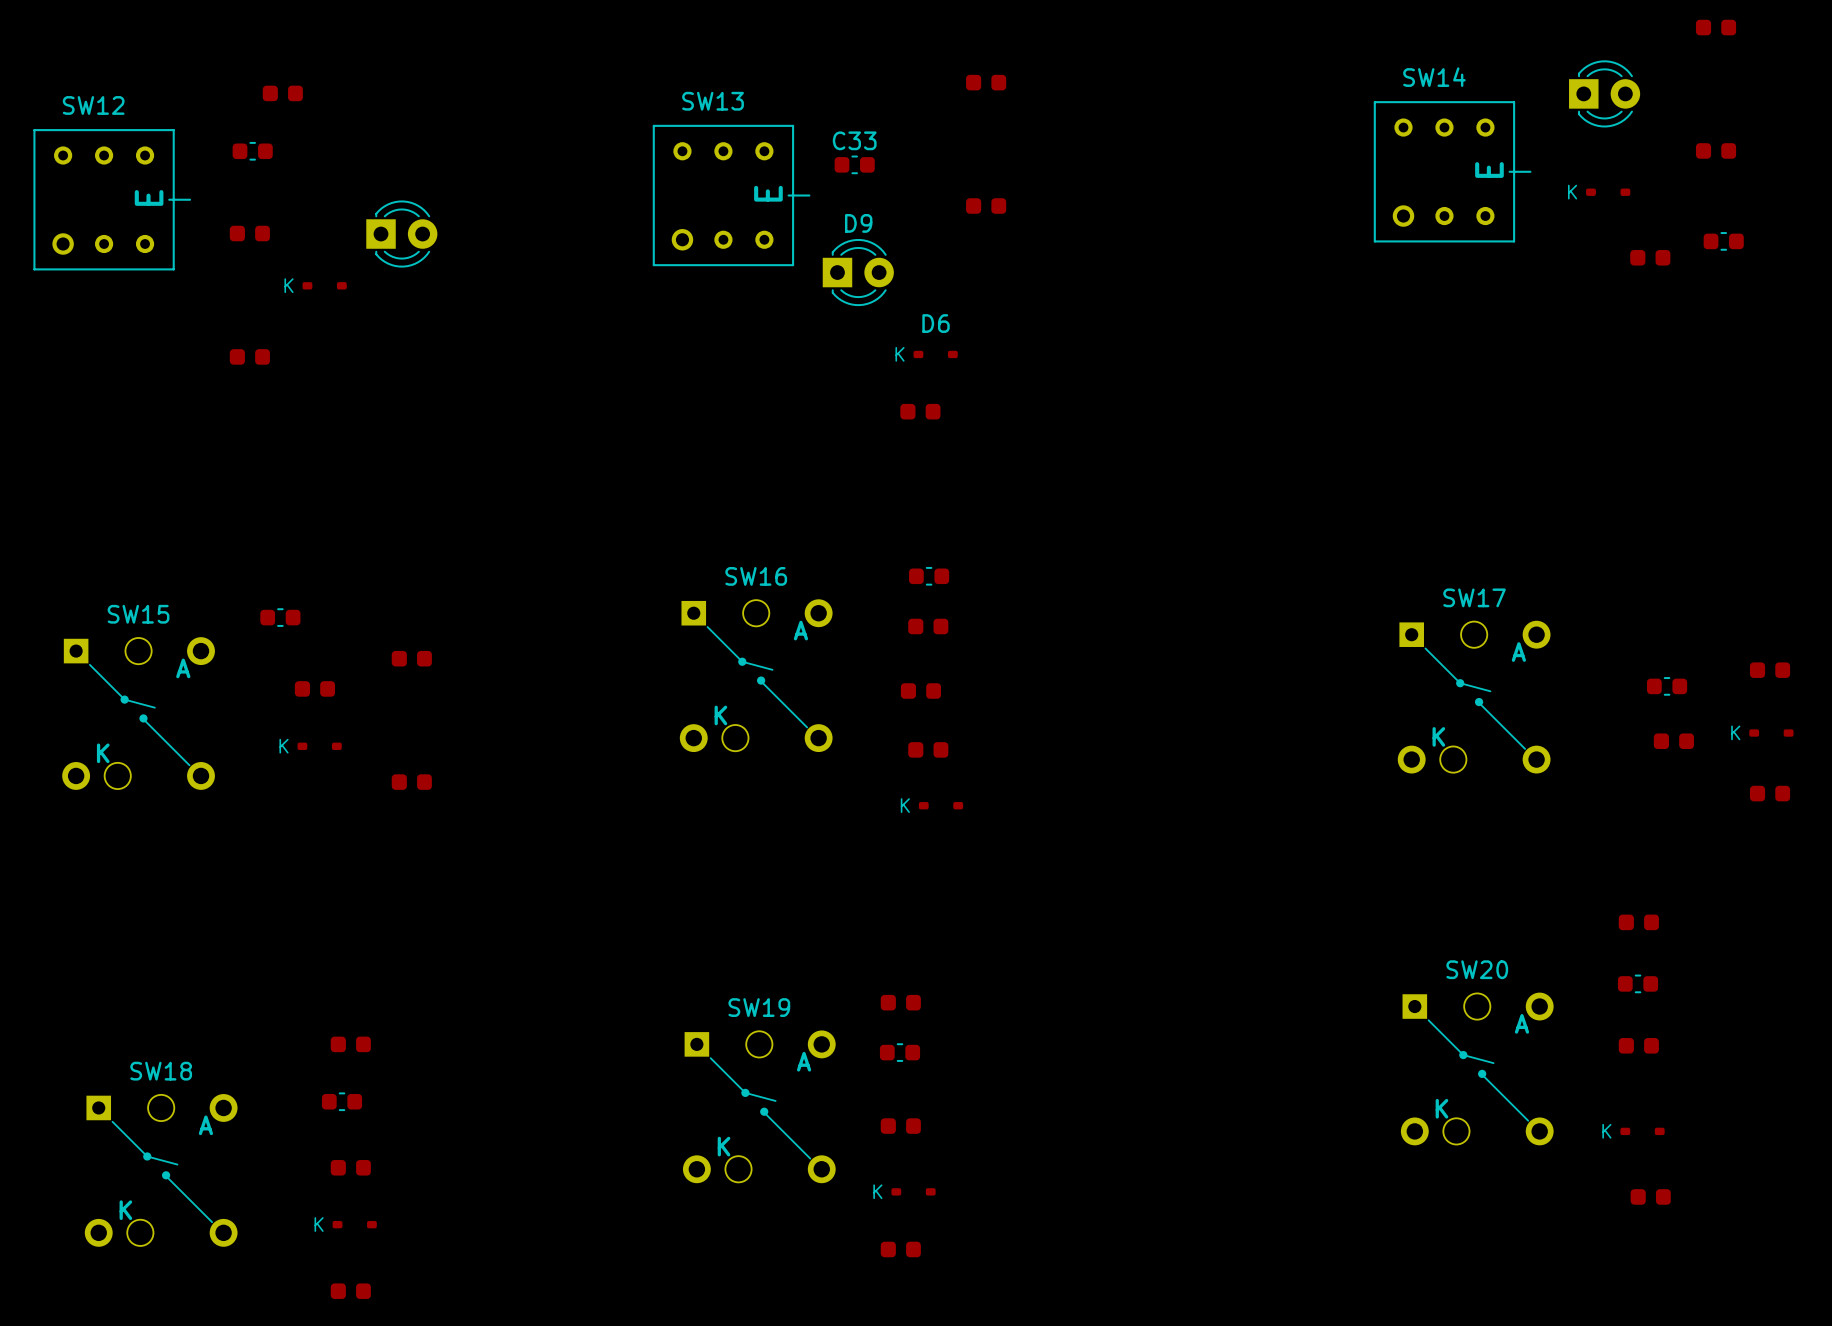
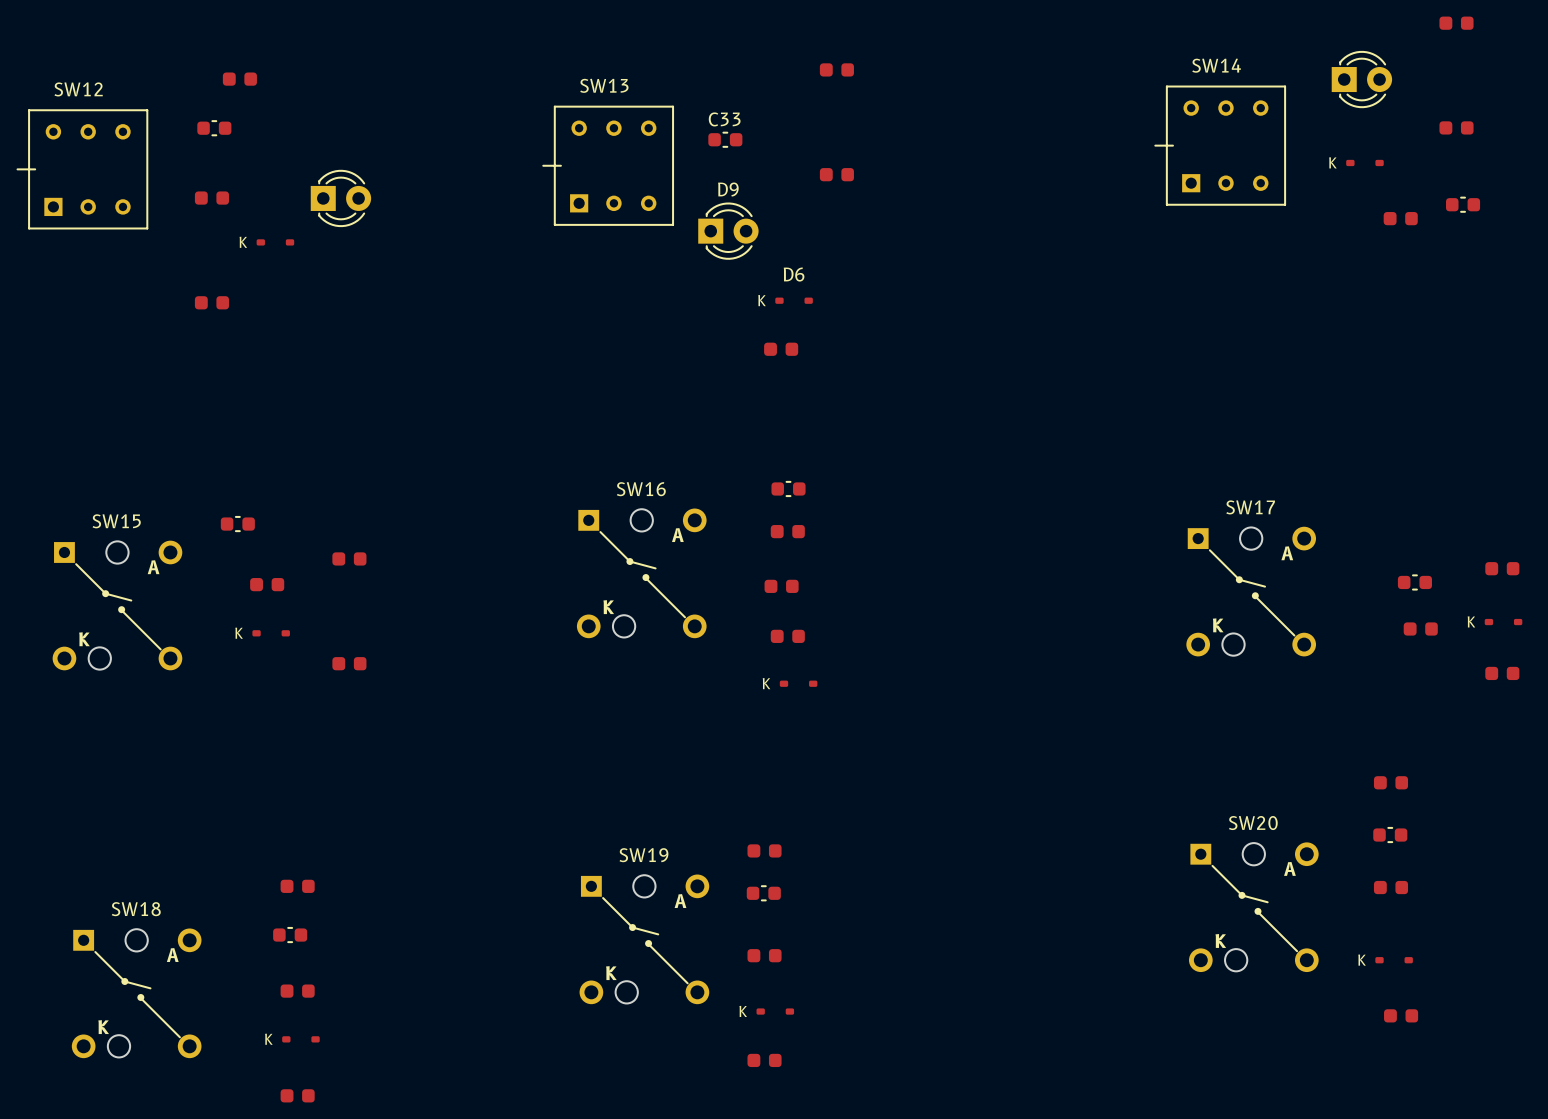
SW14 footprint: [1373, 101, 1532, 243] -> [1154, 85, 1286, 206]
SW13 footprint: [652, 124, 811, 267] -> [542, 105, 674, 226]
SW12 footprint: [33, 129, 192, 271] -> [16, 109, 149, 230]

